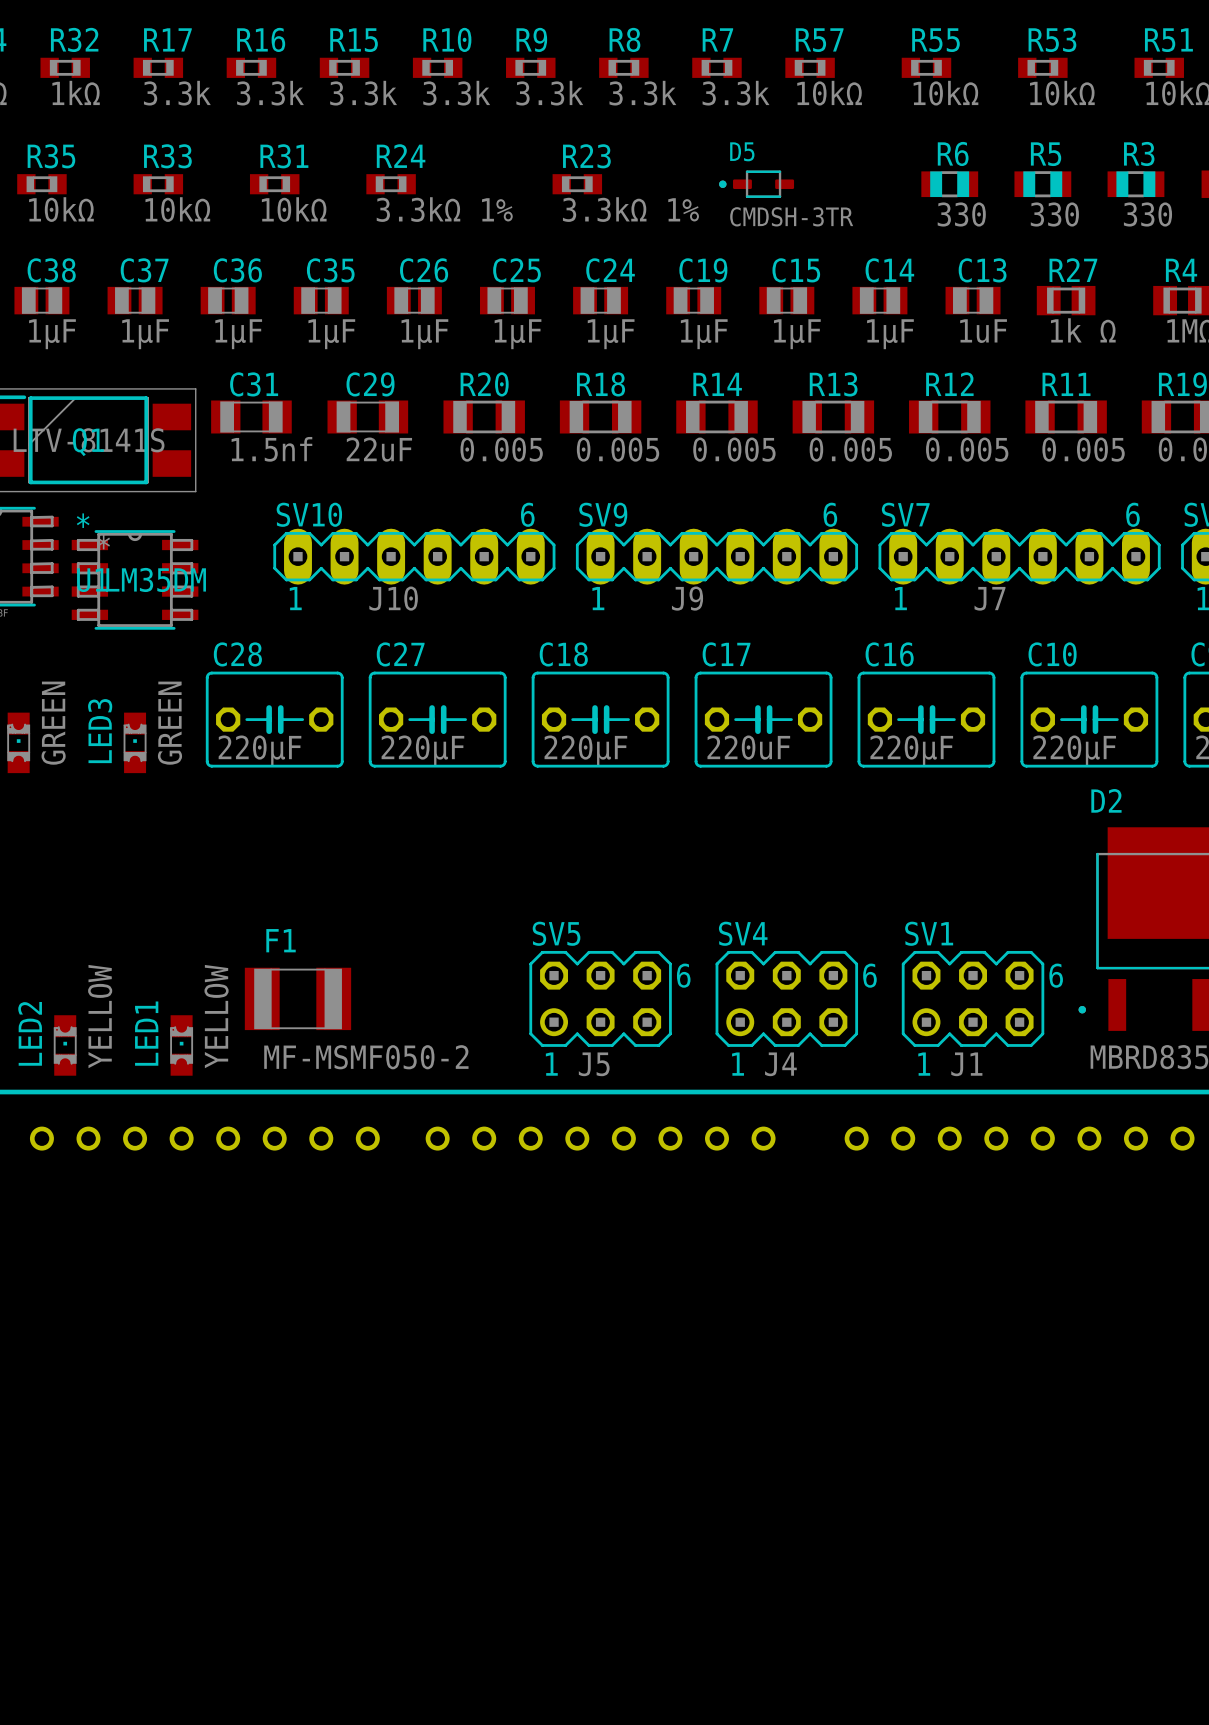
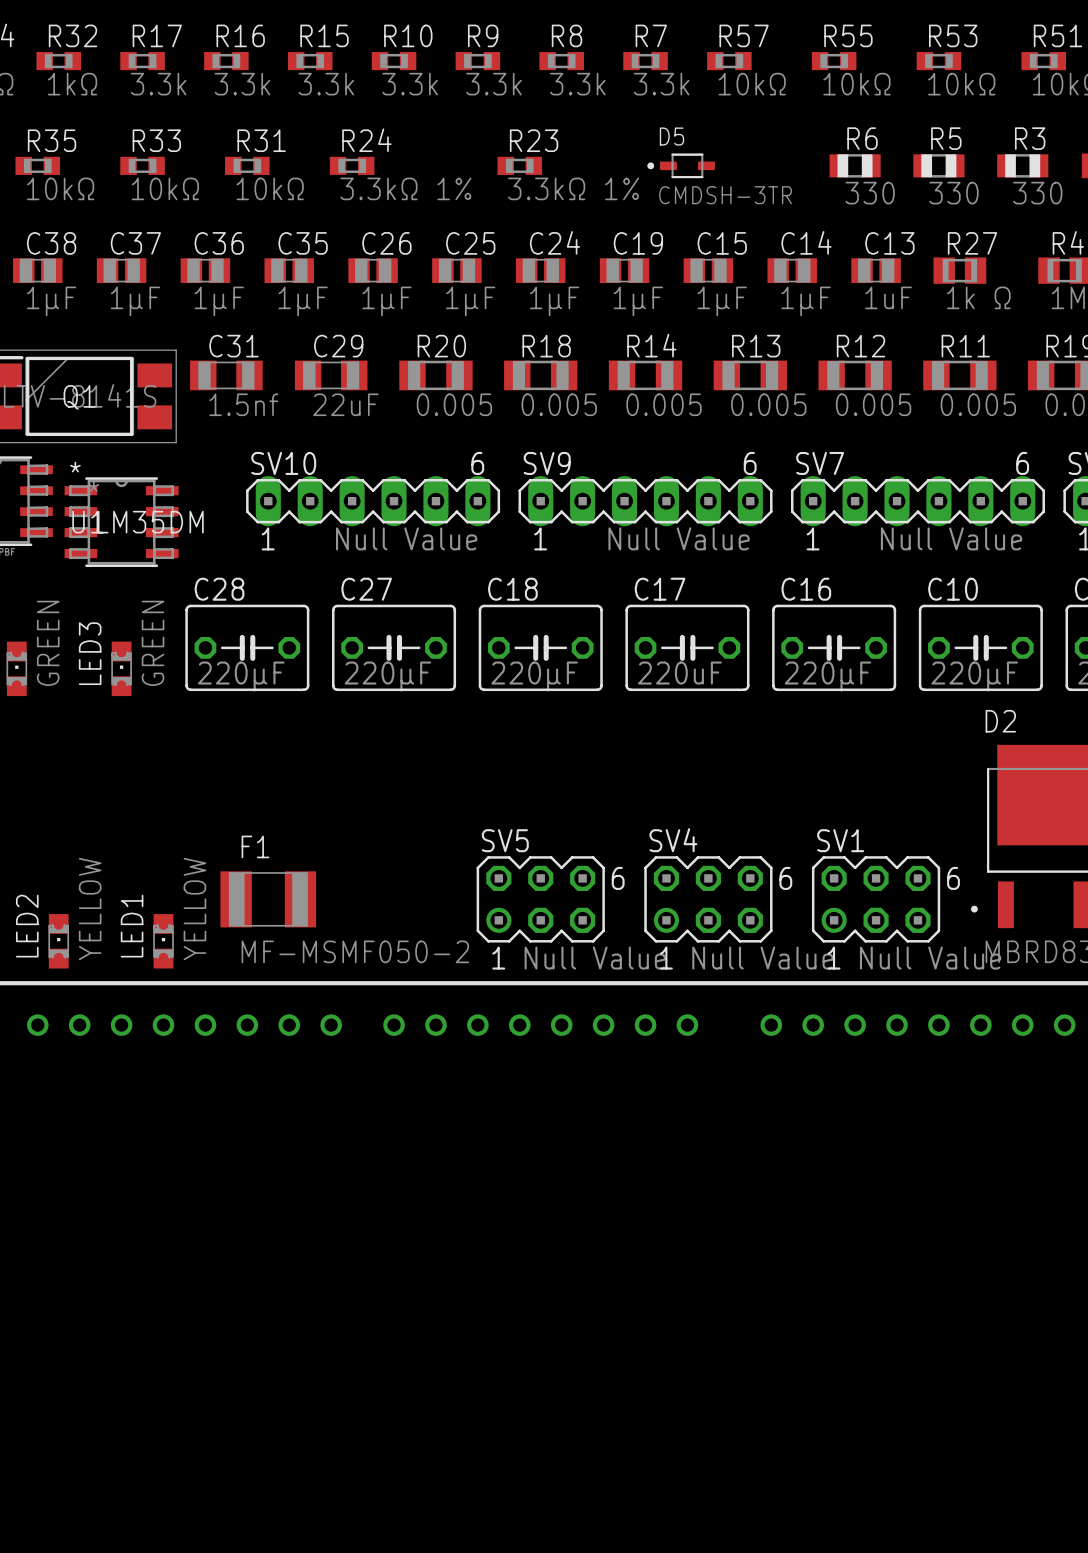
SV10 value: J10 (393, 598) -> Null Value (406, 538)
SV9 value: J9 (687, 598) -> Null Value (679, 538)
SV7 value: J7 (990, 598) -> Null Value (951, 538)
SV5 value: J5 (594, 1064) -> Null Value (595, 958)
SV4 value: J4 (780, 1064) -> Null Value (762, 958)
SV1 value: J1 (966, 1064) -> Null Value (930, 958)

